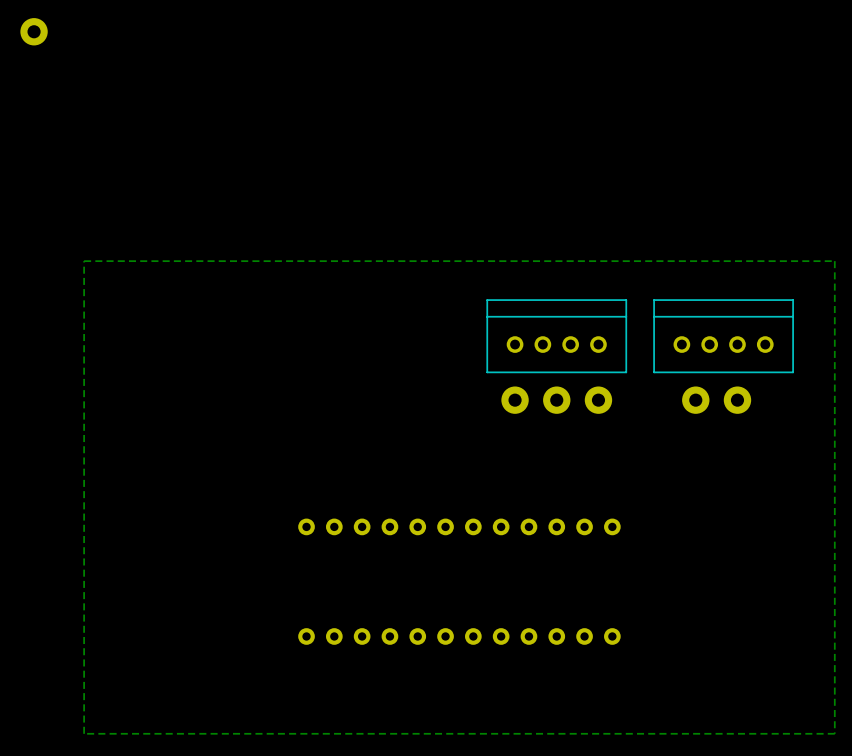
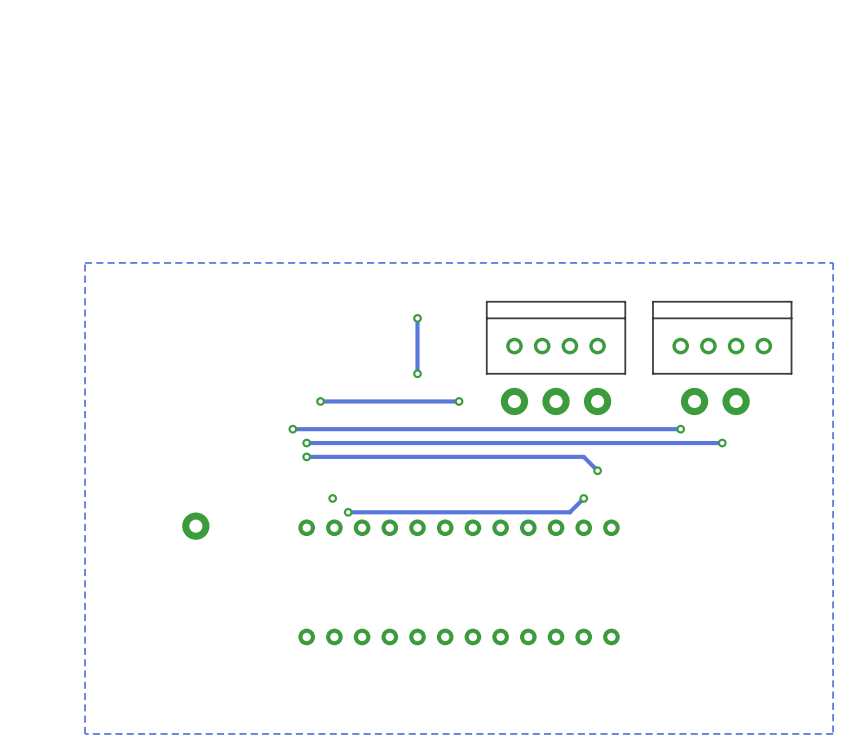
part: (34, 31) -> none
track: none -> (417, 318) (417, 373)
via: none -> (417, 318)
via: none -> (417, 373)
via: none -> (320, 401)
track: none -> (459, 401) (320, 401)
via: none -> (459, 401)
via: none -> (292, 429)
track: none -> (680, 429) (292, 429)
via: none -> (680, 429)
via: none -> (306, 443)
track: none -> (722, 443) (306, 443)
via: none -> (722, 443)
track: none -> (306, 456) (583, 456) (597, 470)
via: none -> (306, 456)
via: none -> (597, 470)
via: none -> (332, 498)
track: none -> (583, 498) (569, 512) (348, 512)
via: none -> (583, 498)
via: none -> (348, 512)
part: none -> (195, 526)

